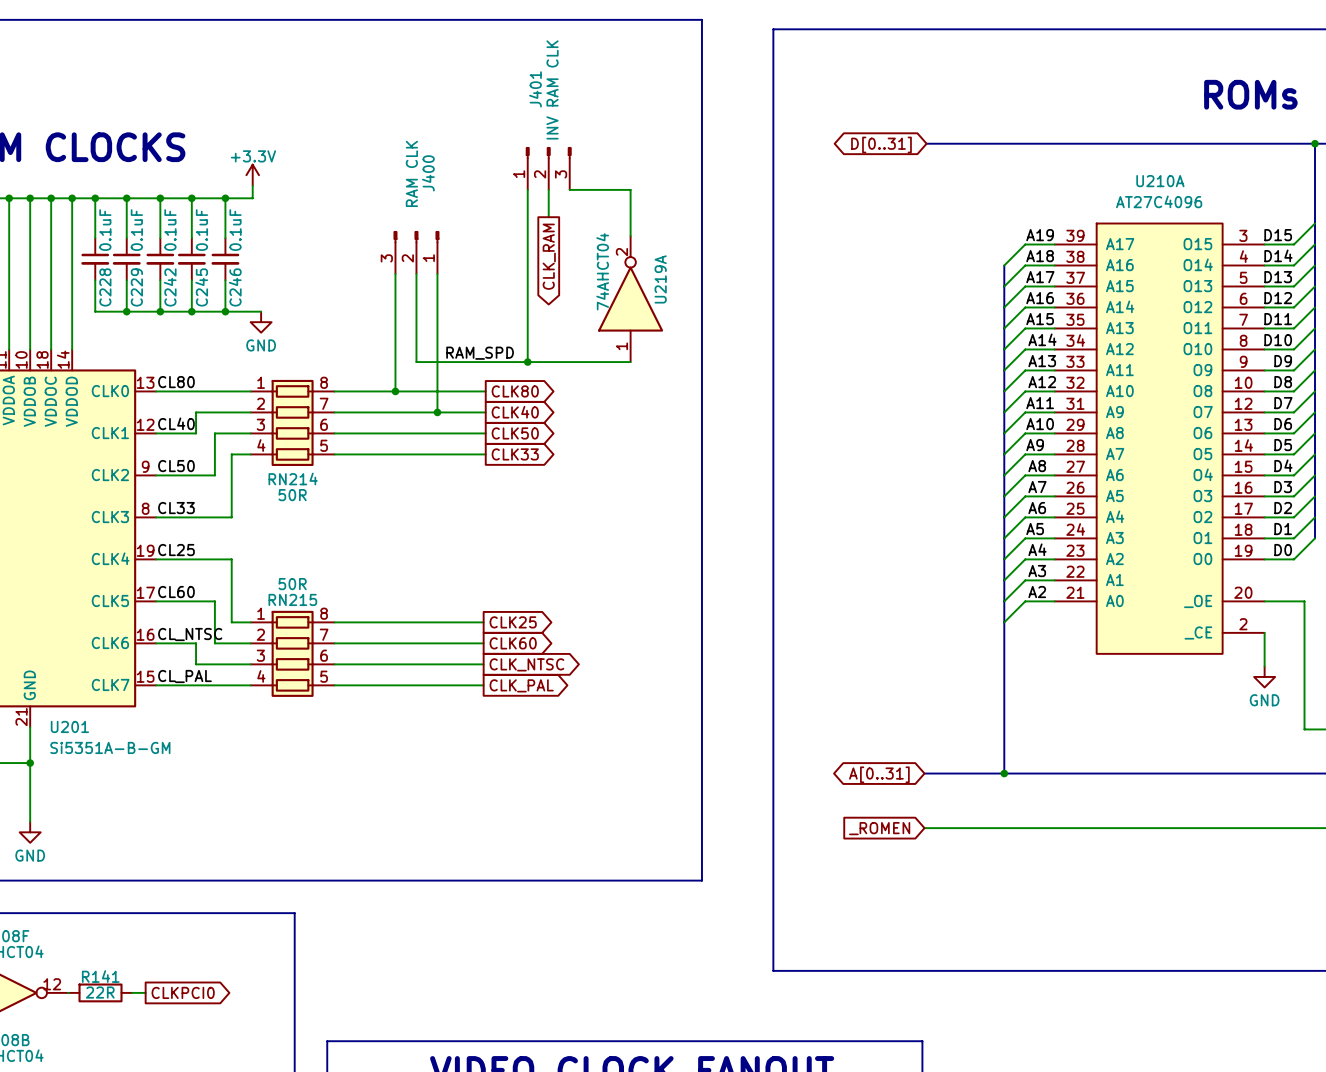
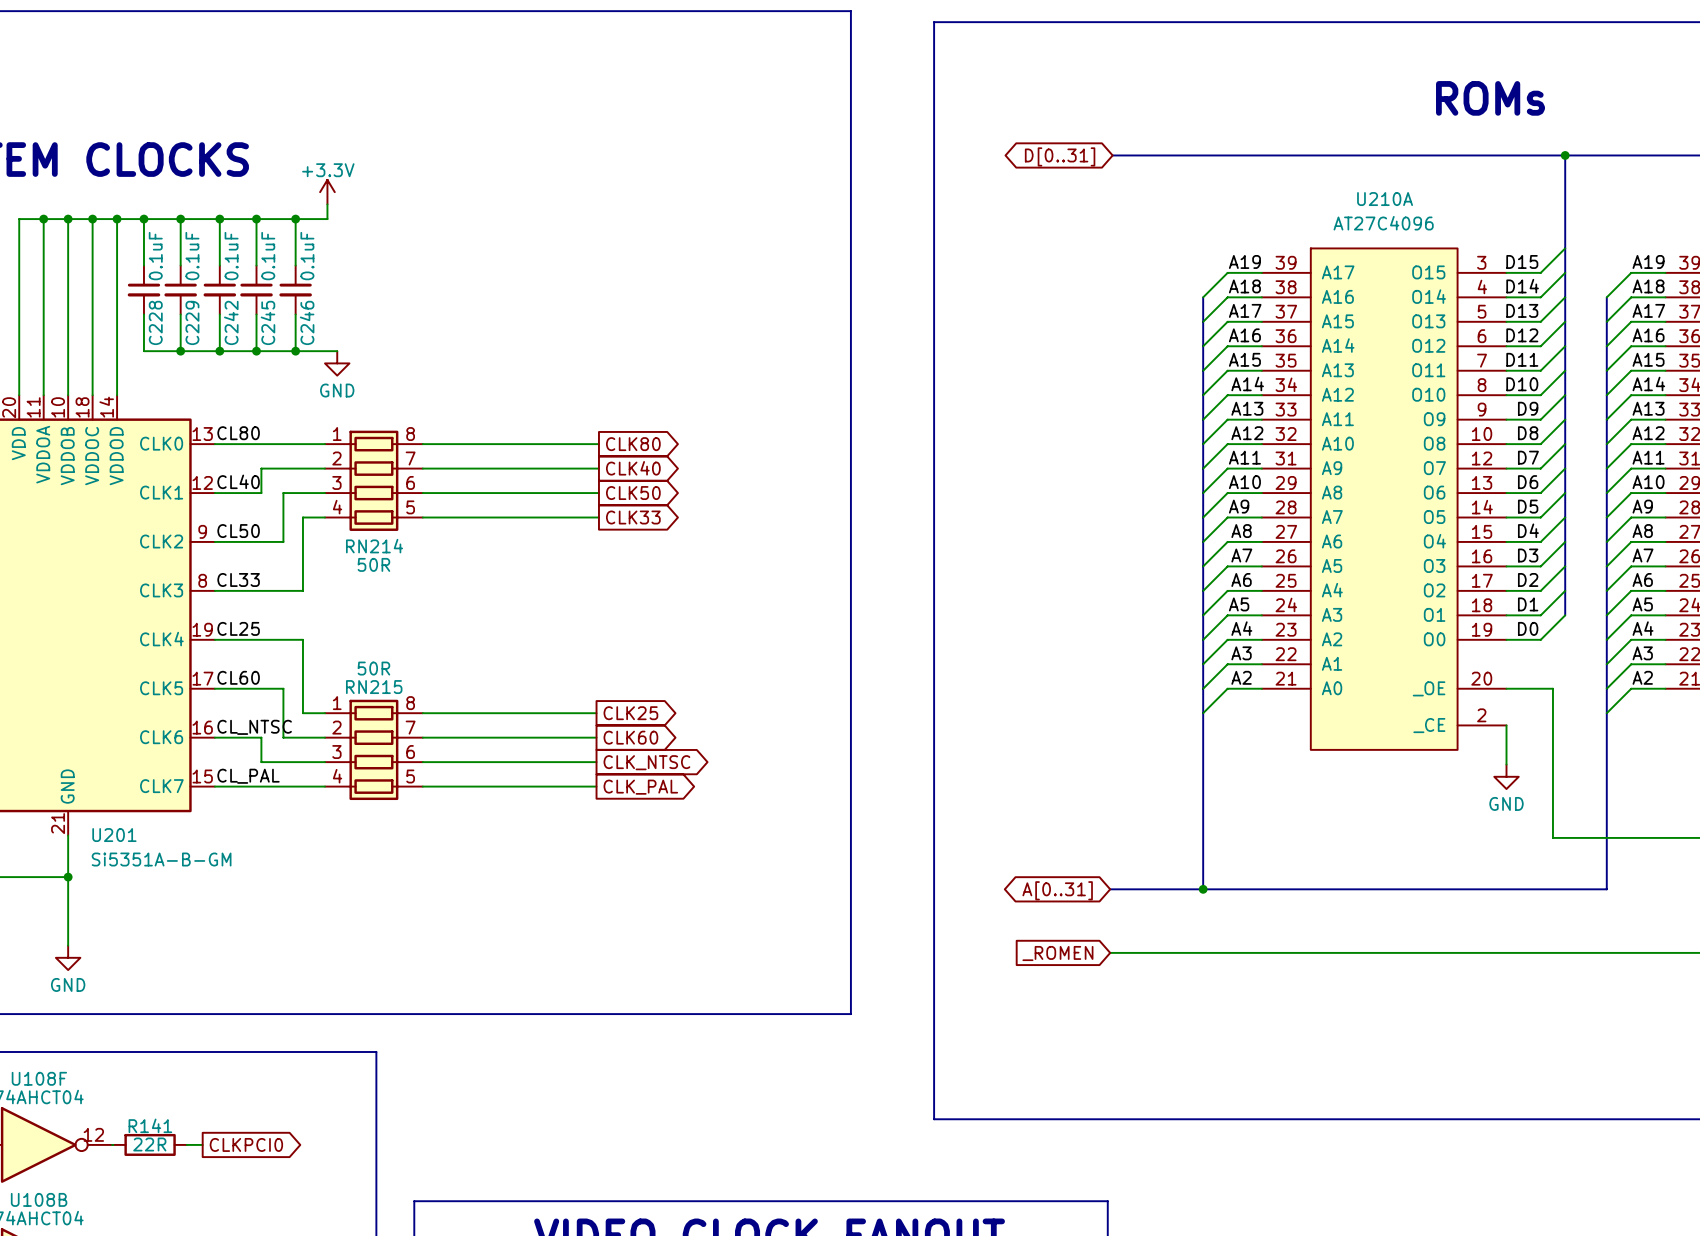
J401: INV RAM CLK (548, 168) -> none
wire: (527, 189) (527, 362) -> none
wire: (548, 189) (548, 217) -> none
wire: (569, 189) (630, 189) (630, 236) -> none
J400: RAM CLK (416, 252) -> none
global label: CLK_RAM (549, 256) -> none
wire: (395, 273) (395, 391) -> none
wire: (416, 273) (416, 362) (630, 362) -> none
wire: (437, 273) (437, 412) -> none
U219A: 74AHCT04 (630, 299) -> none
label: RAM_SPD (480, 353) -> none
junction: (527, 362) -> none
junction: (395, 391) -> none
junction: (437, 412) -> none

